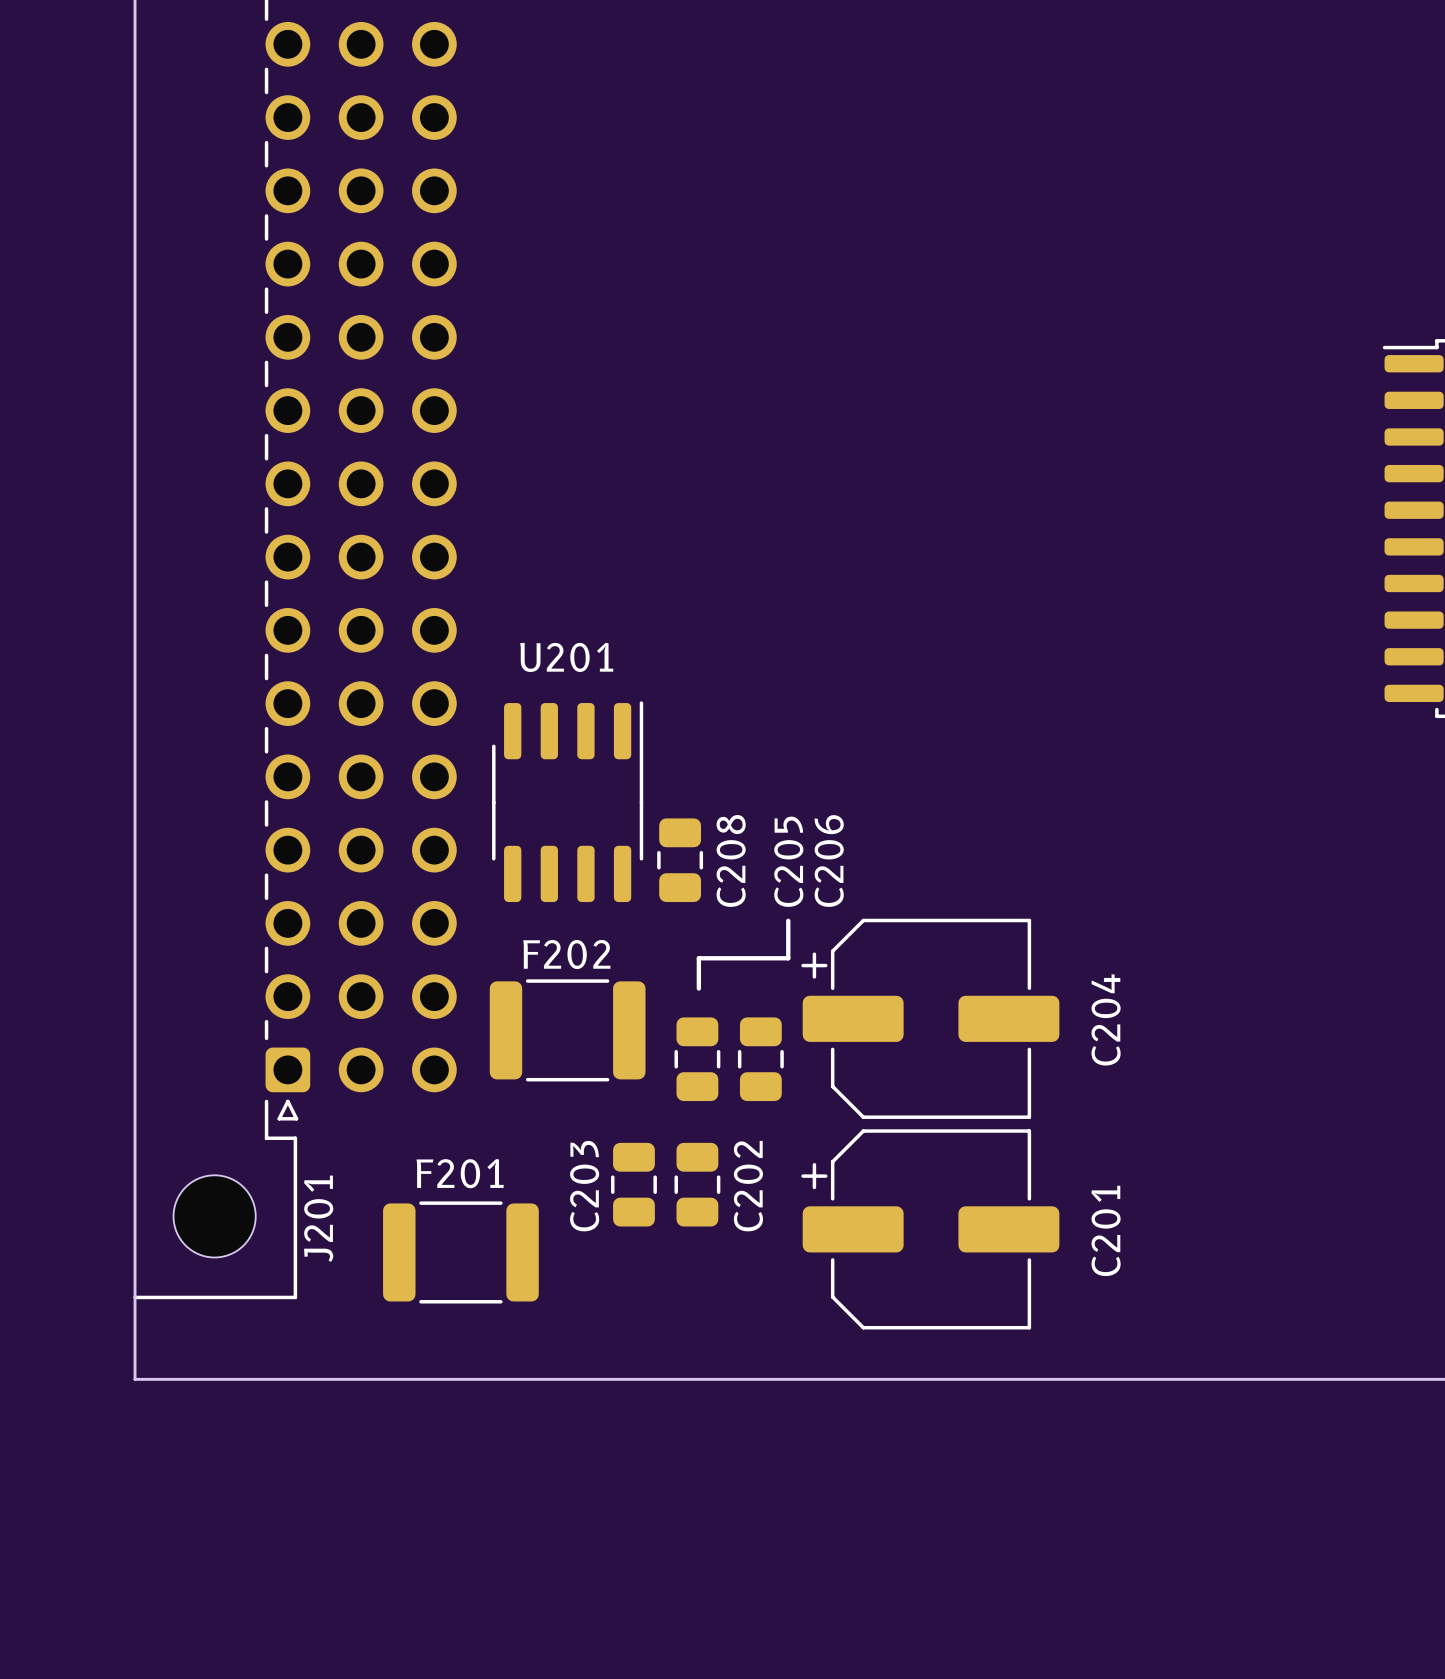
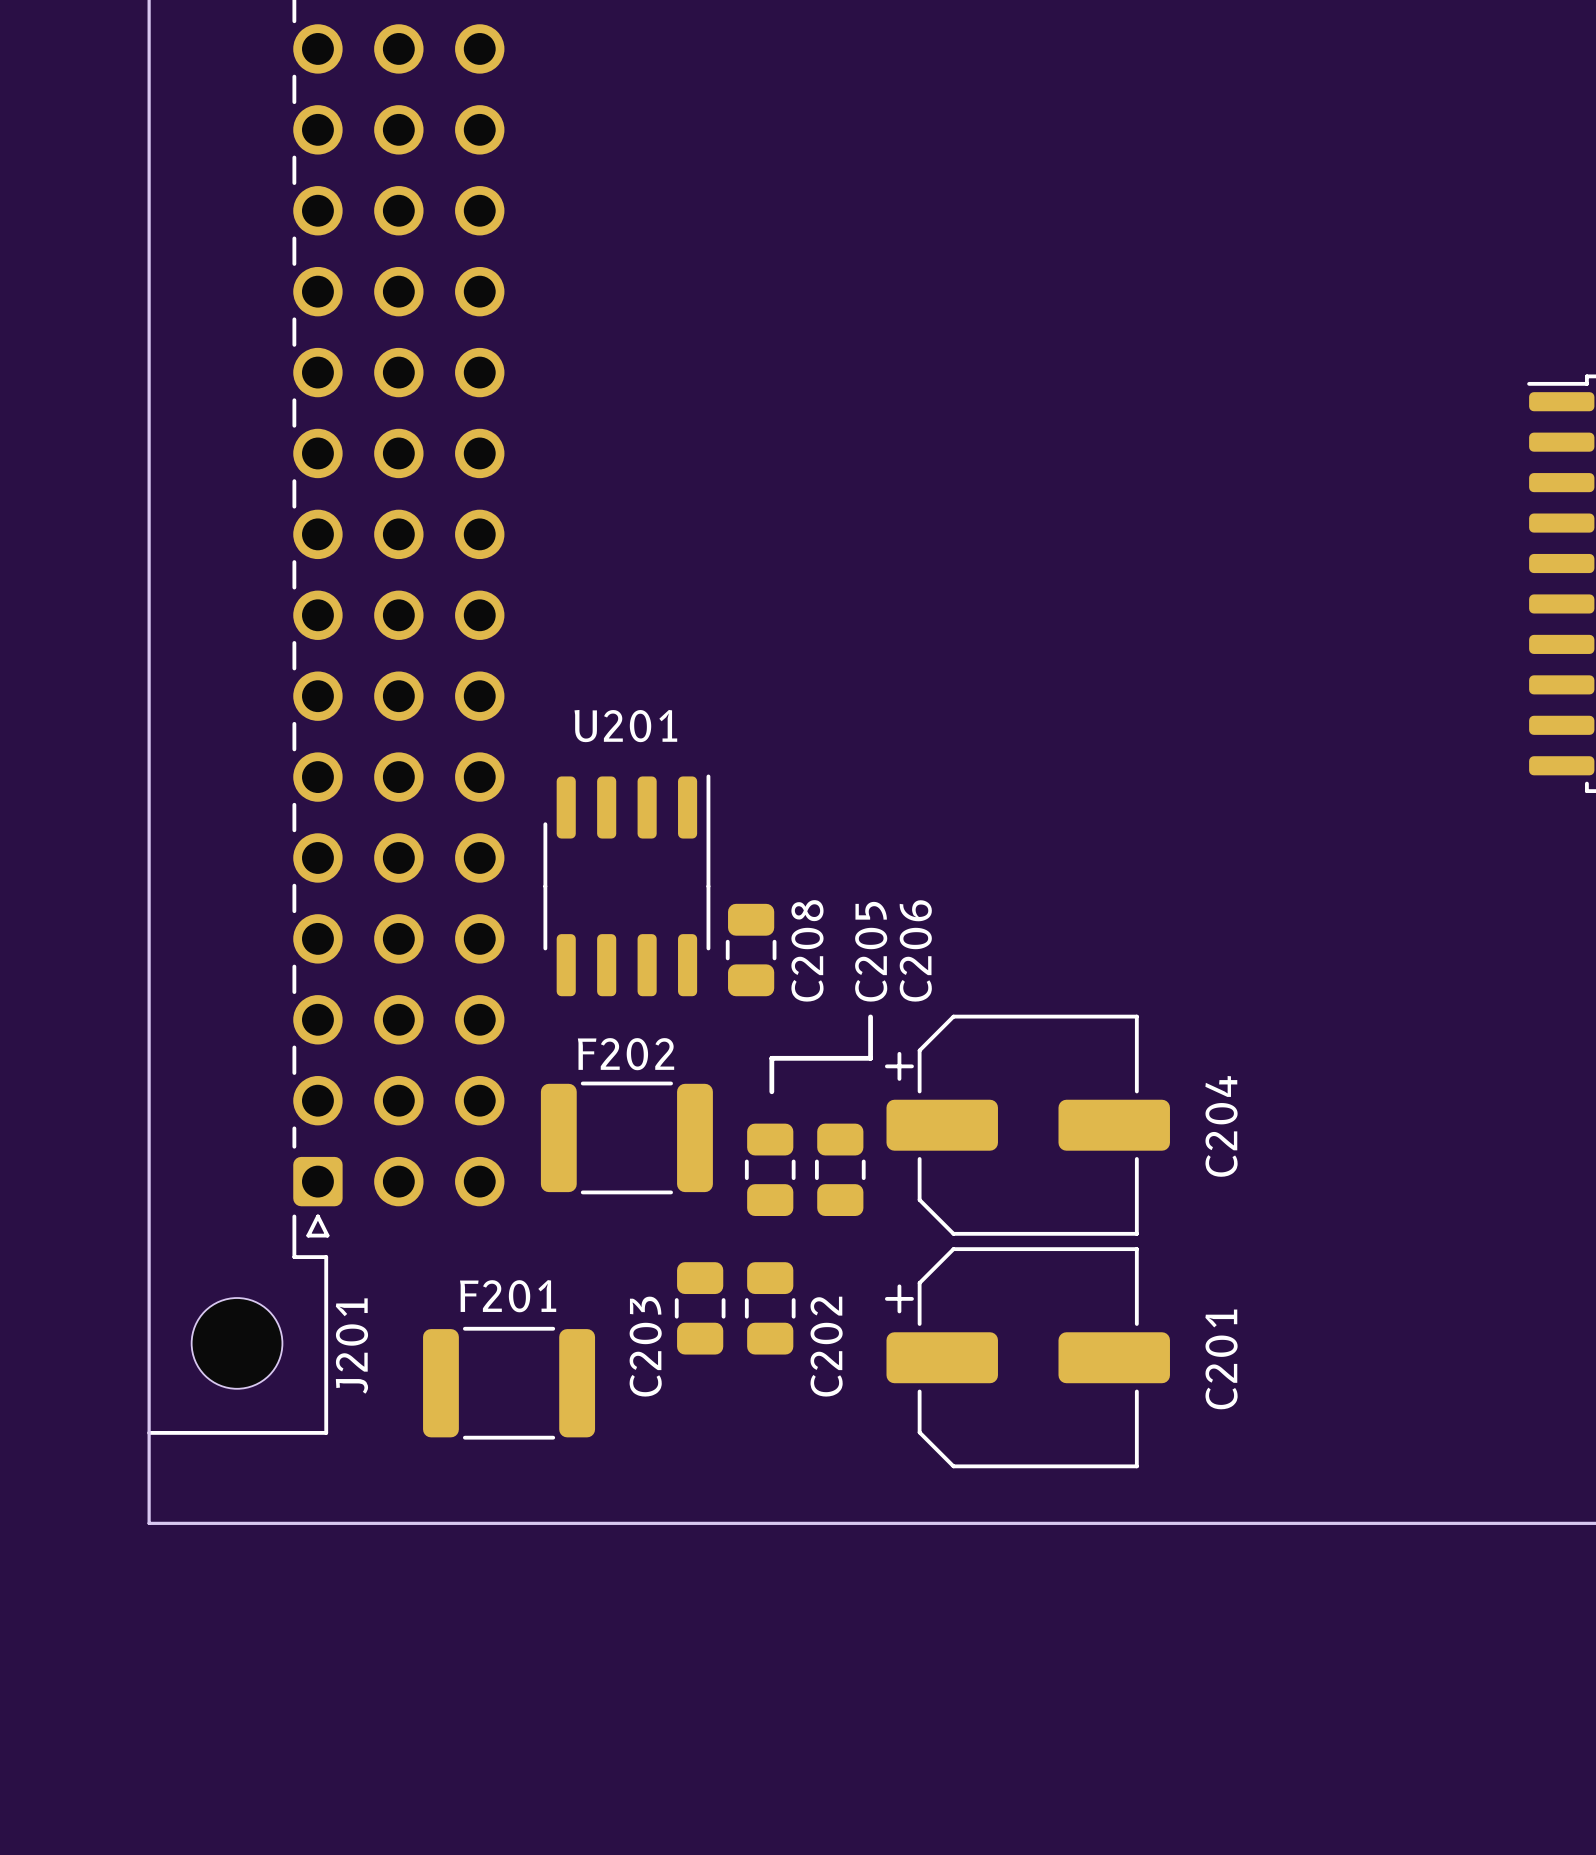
C203 name position: C203 (584, 1186) -> C203 (645, 1346)
C202 name position: C202 (748, 1186) -> C202 (826, 1346)

